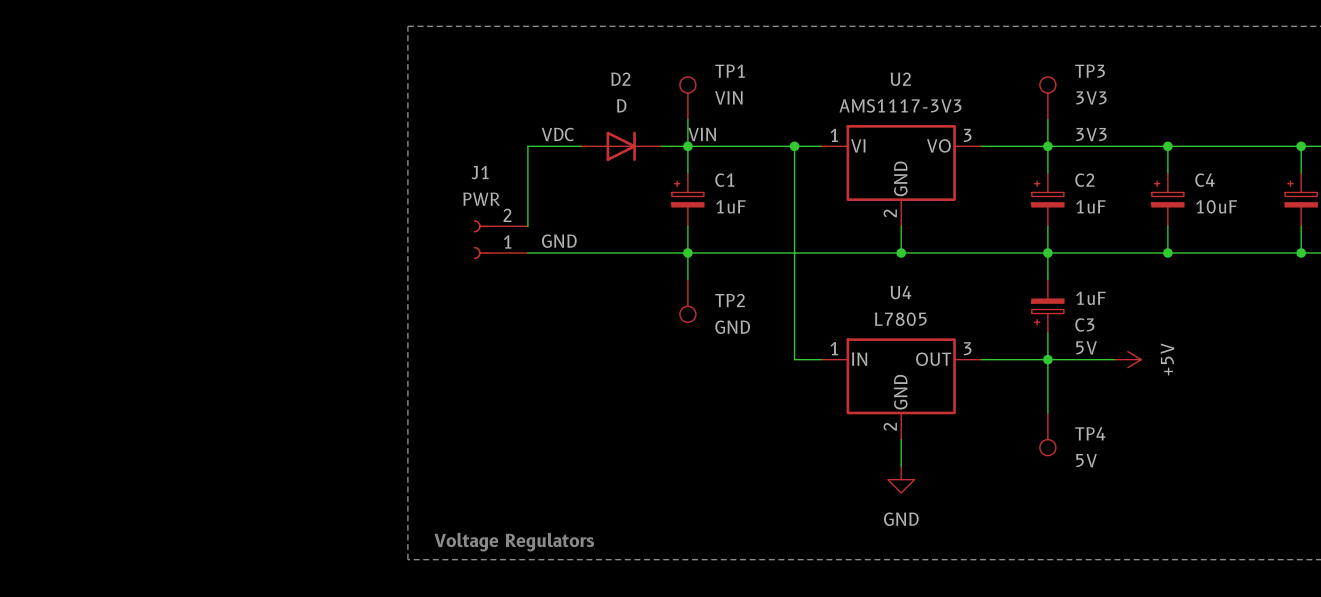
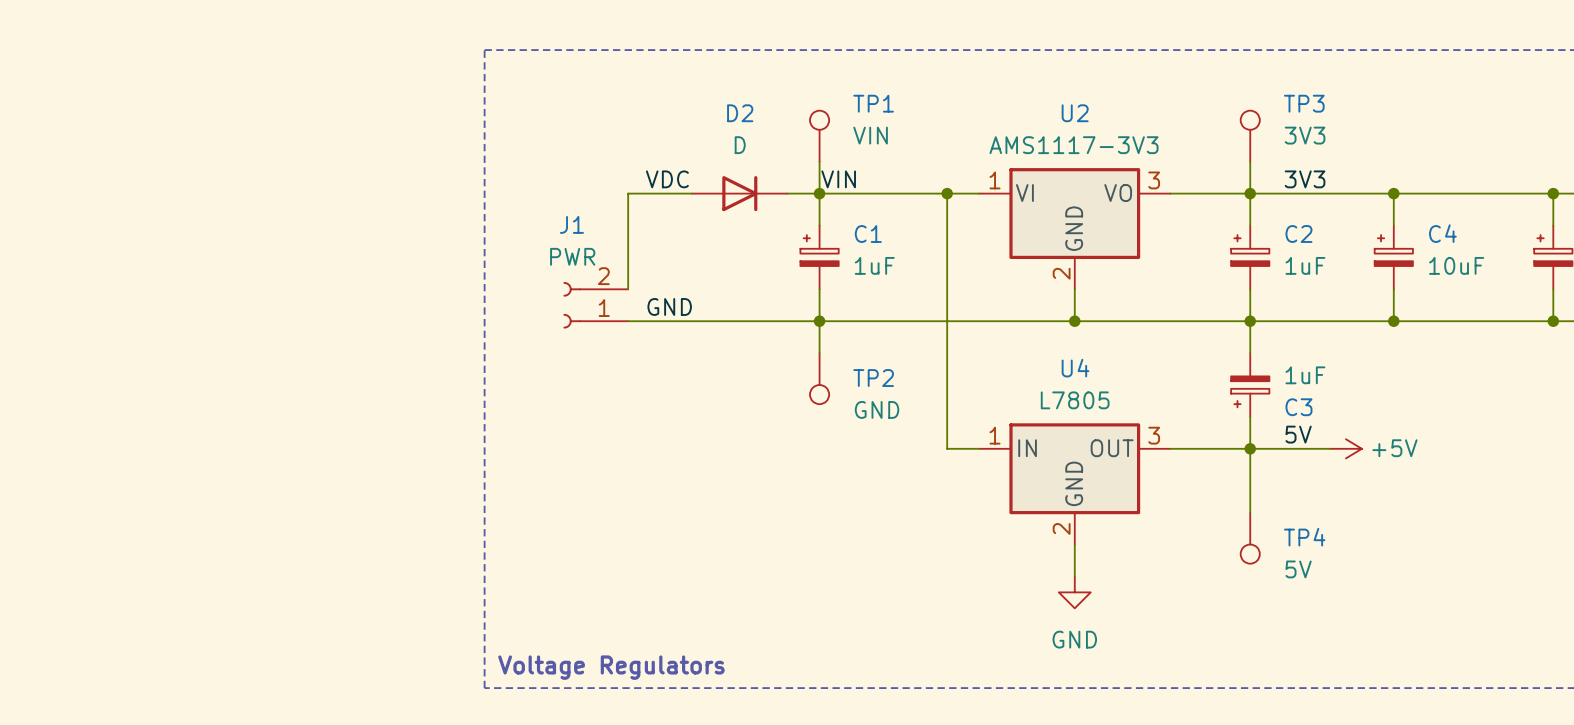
power symbol text rotation: 0° (1167, 359) -> 90° clockwise (1394, 448)

